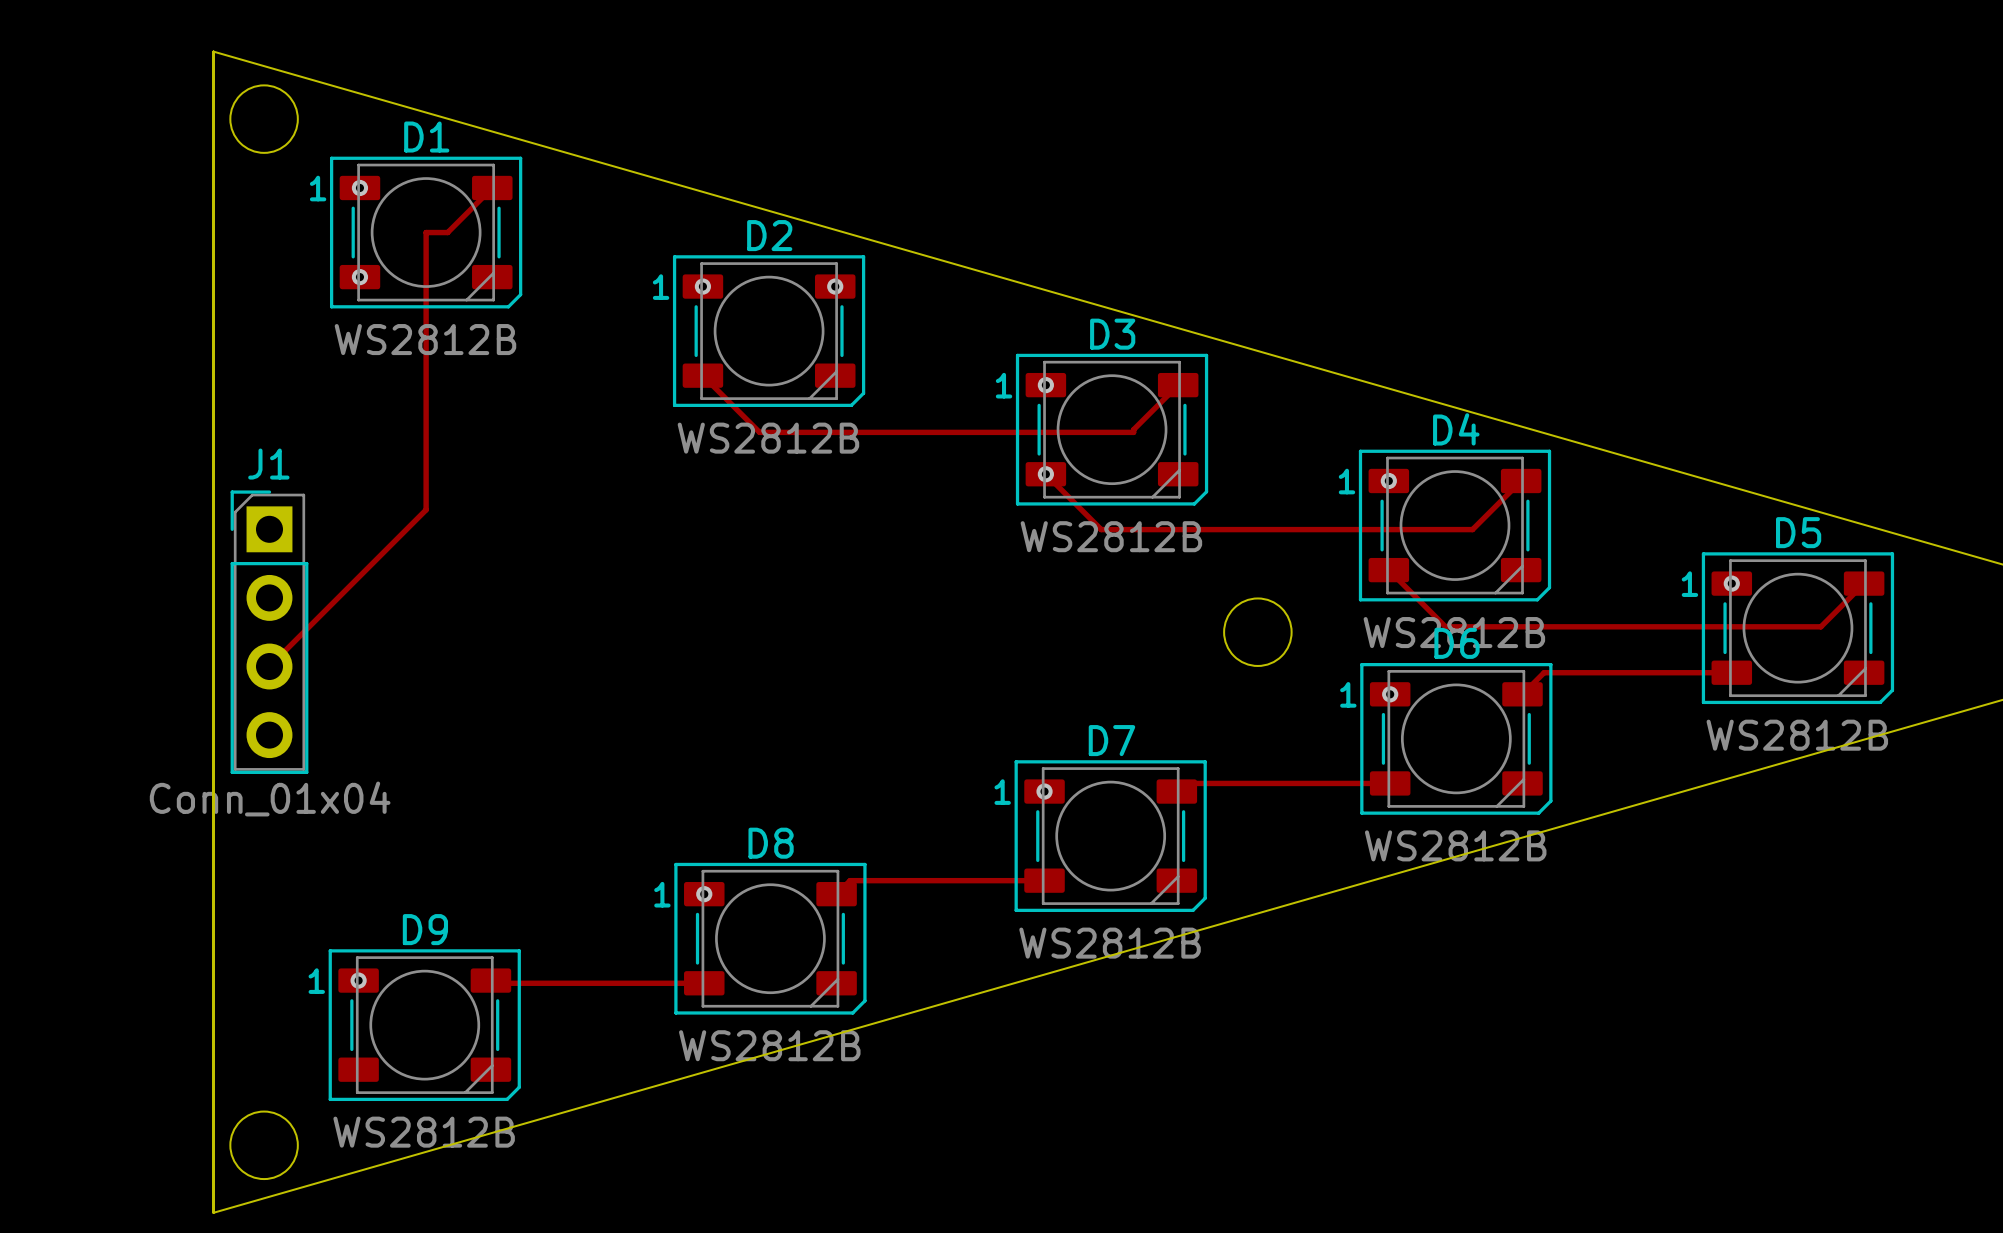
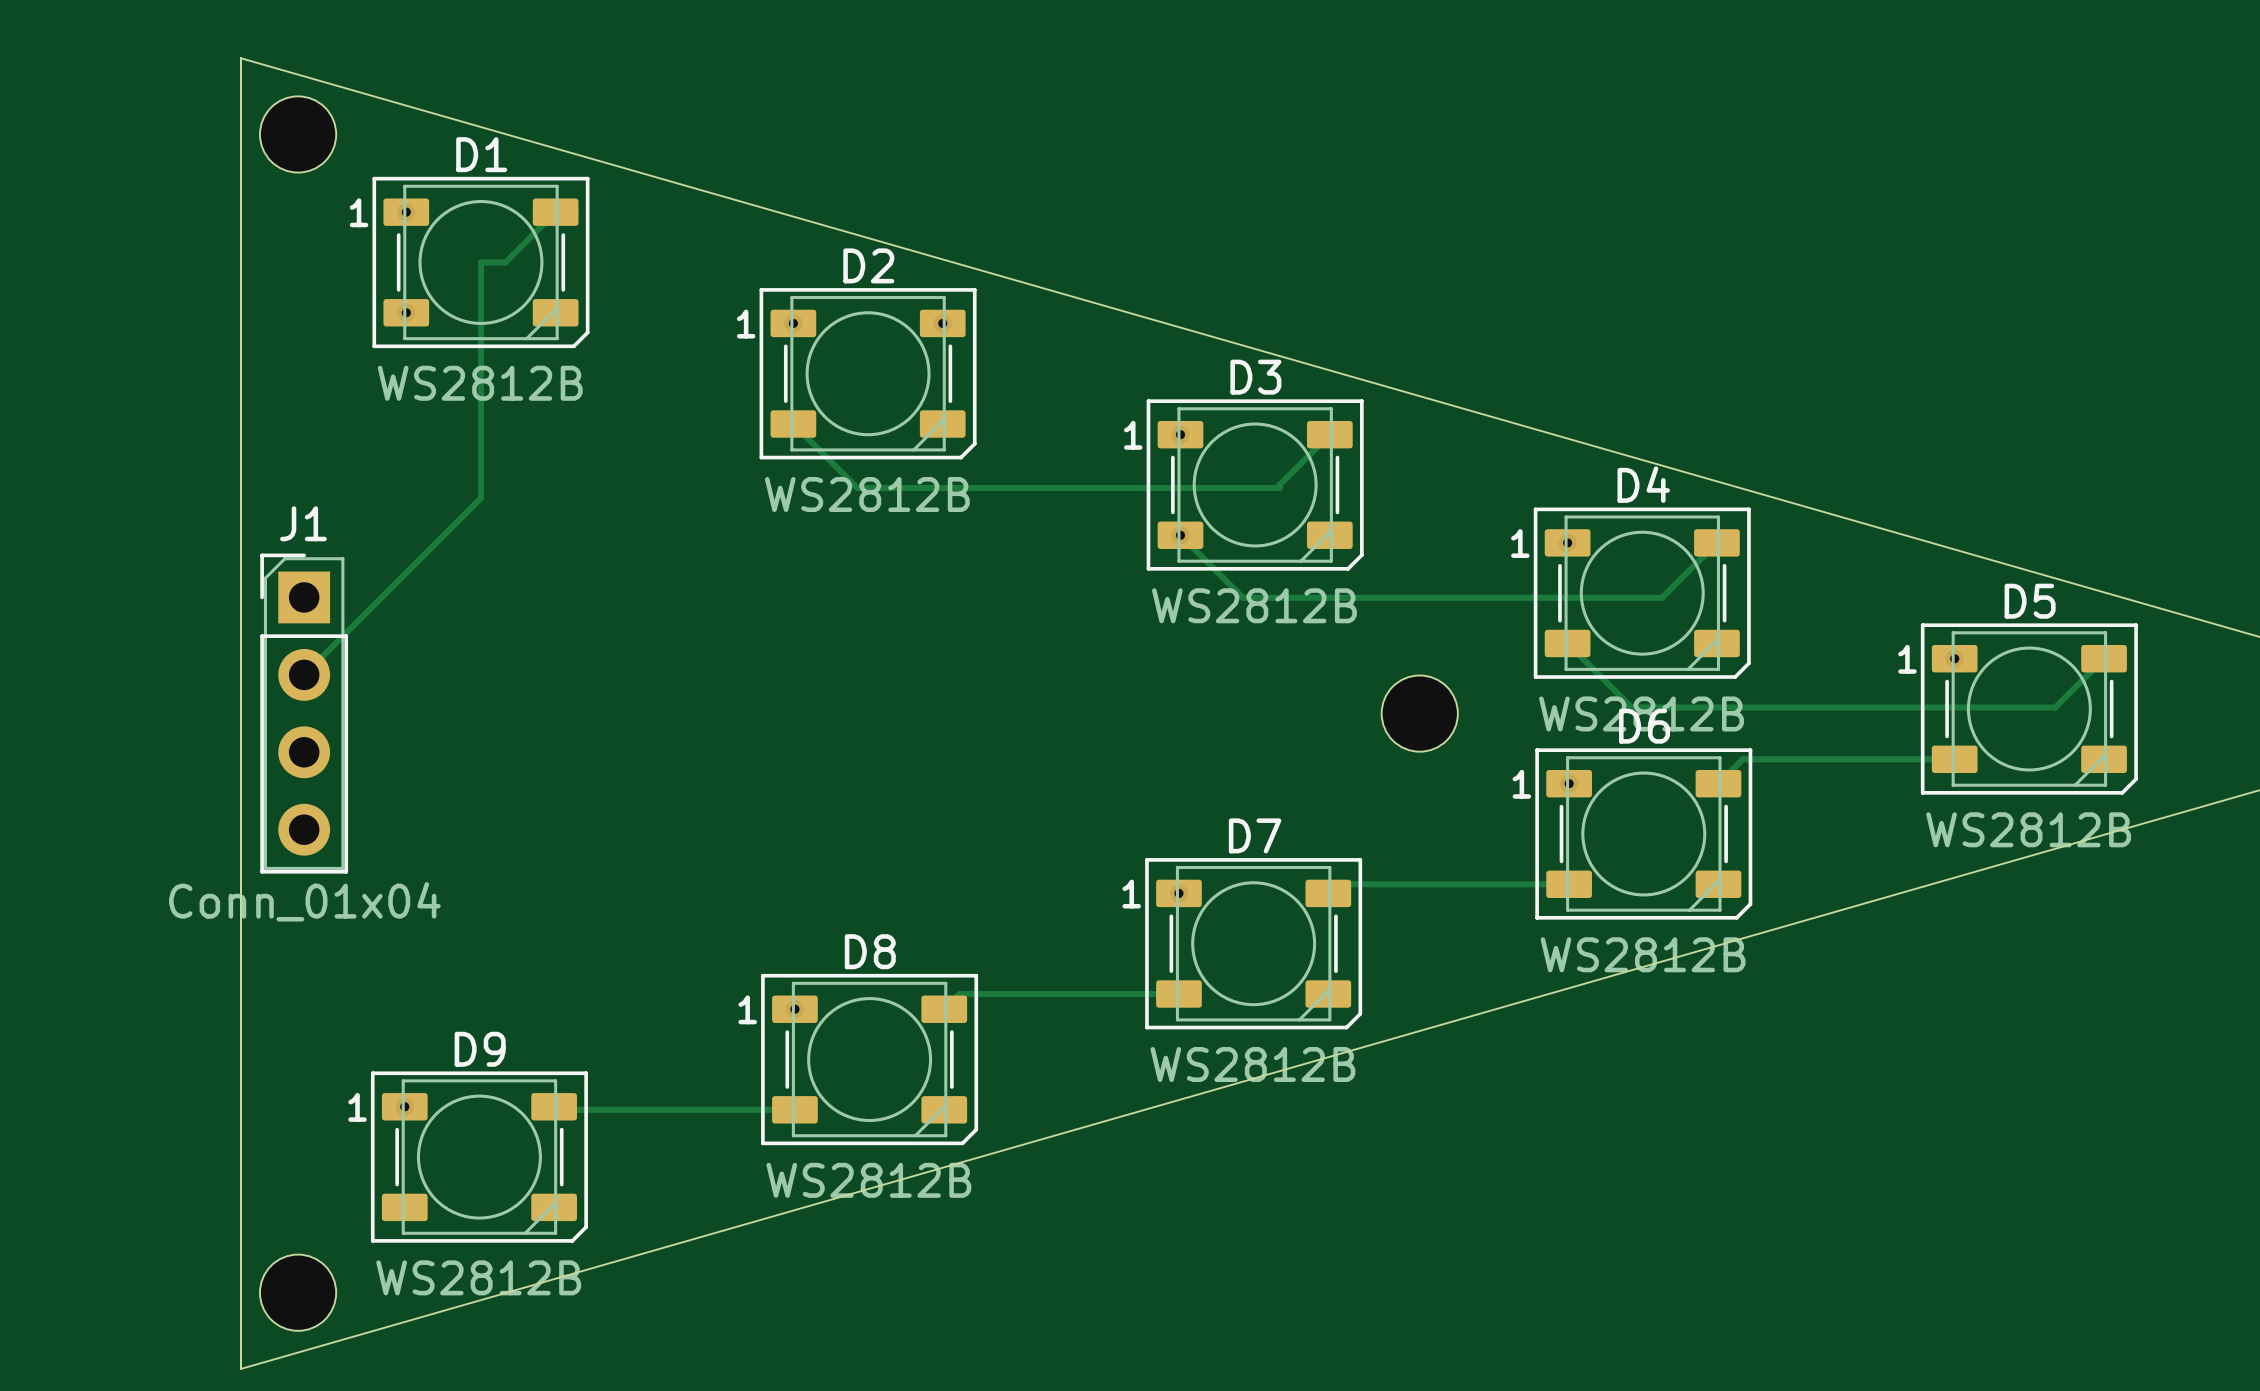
track: (426, 441) (426, 509) (269, 666) -> (480, 498) (304, 674)

